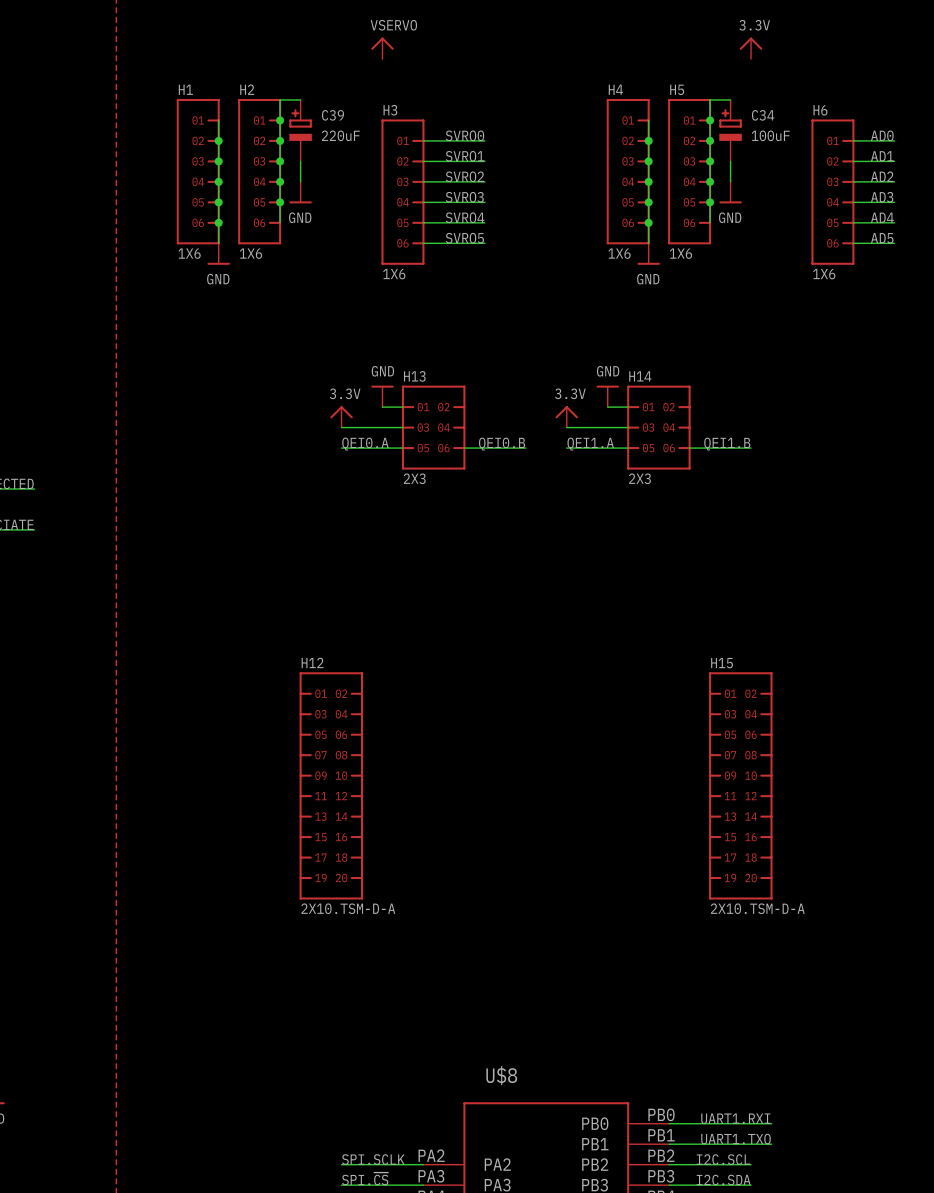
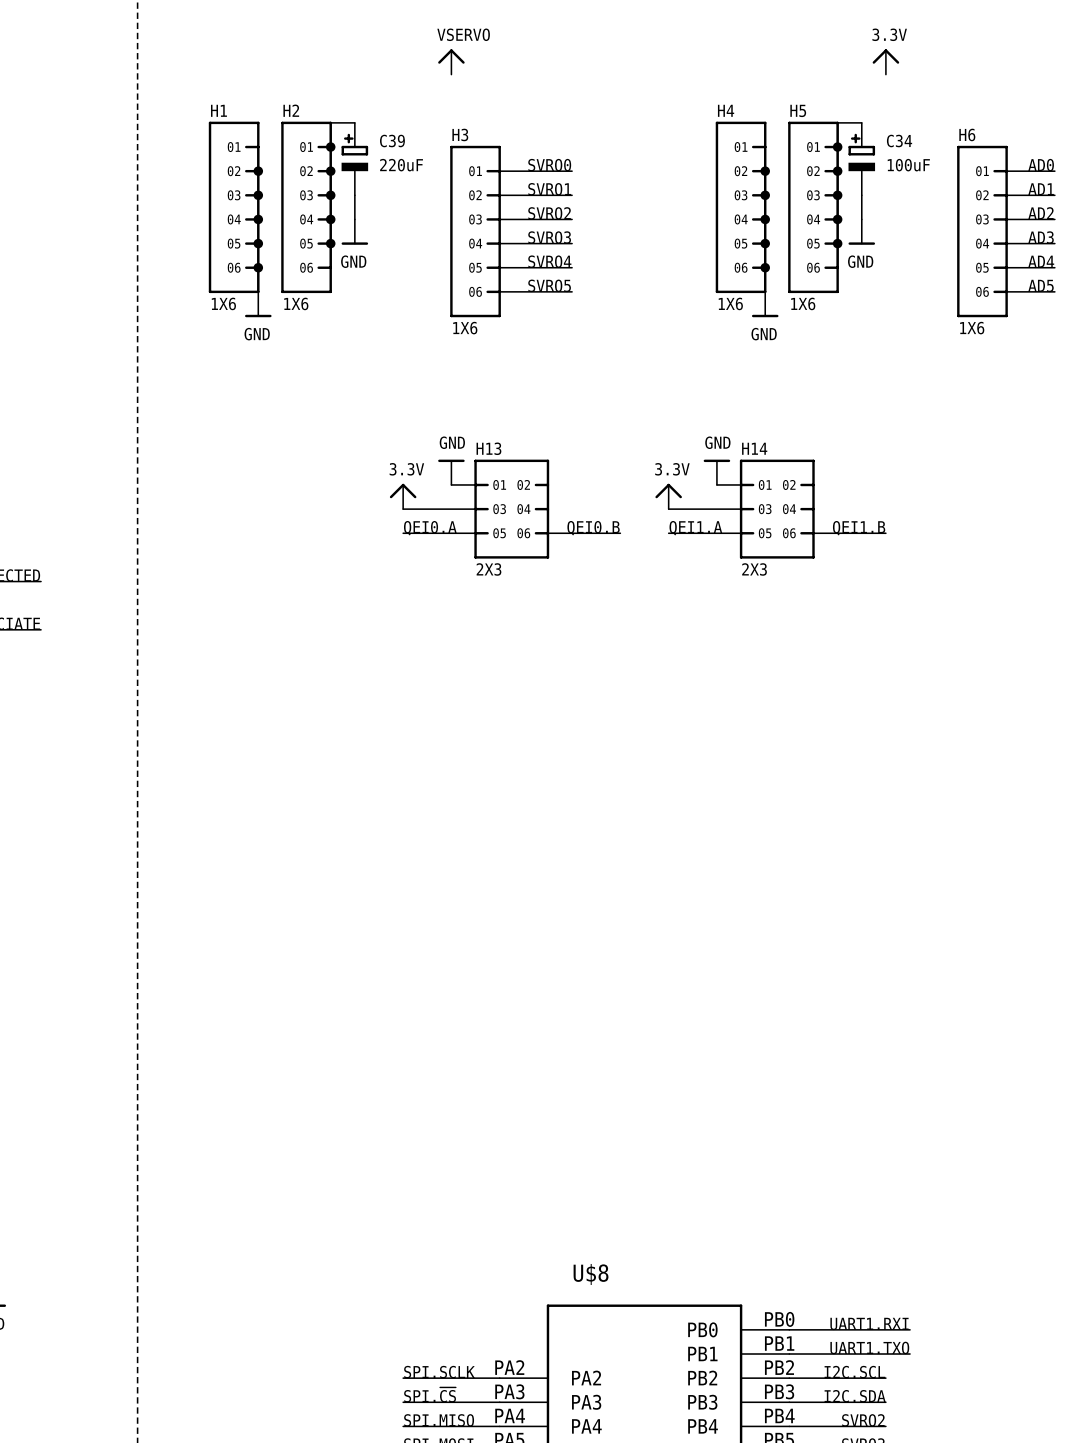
H12: 2X10.TSM-D-A (331, 785) -> none
H15: 2X10.TSM-D-A (740, 785) -> none

